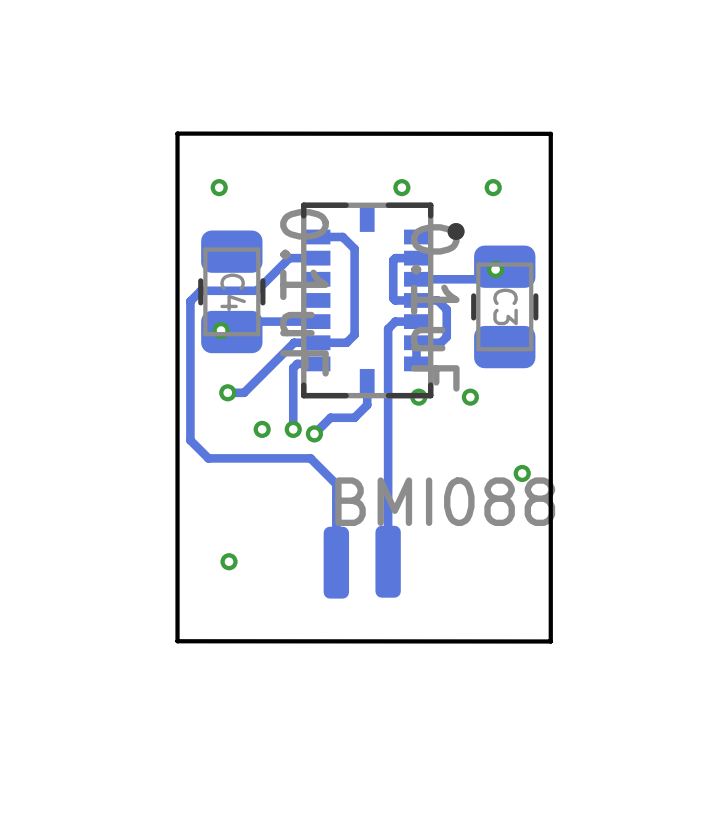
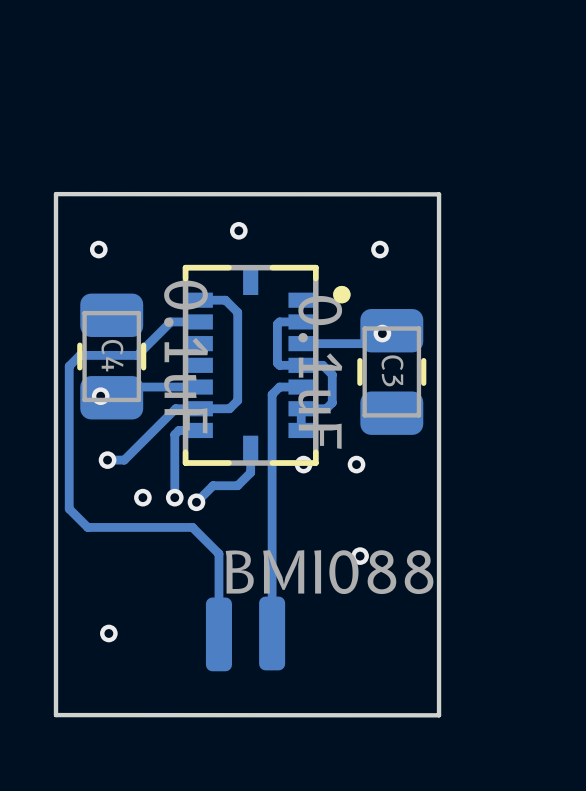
via position: (401, 187) -> (238, 230)
via position: (522, 473) -> (360, 556)

